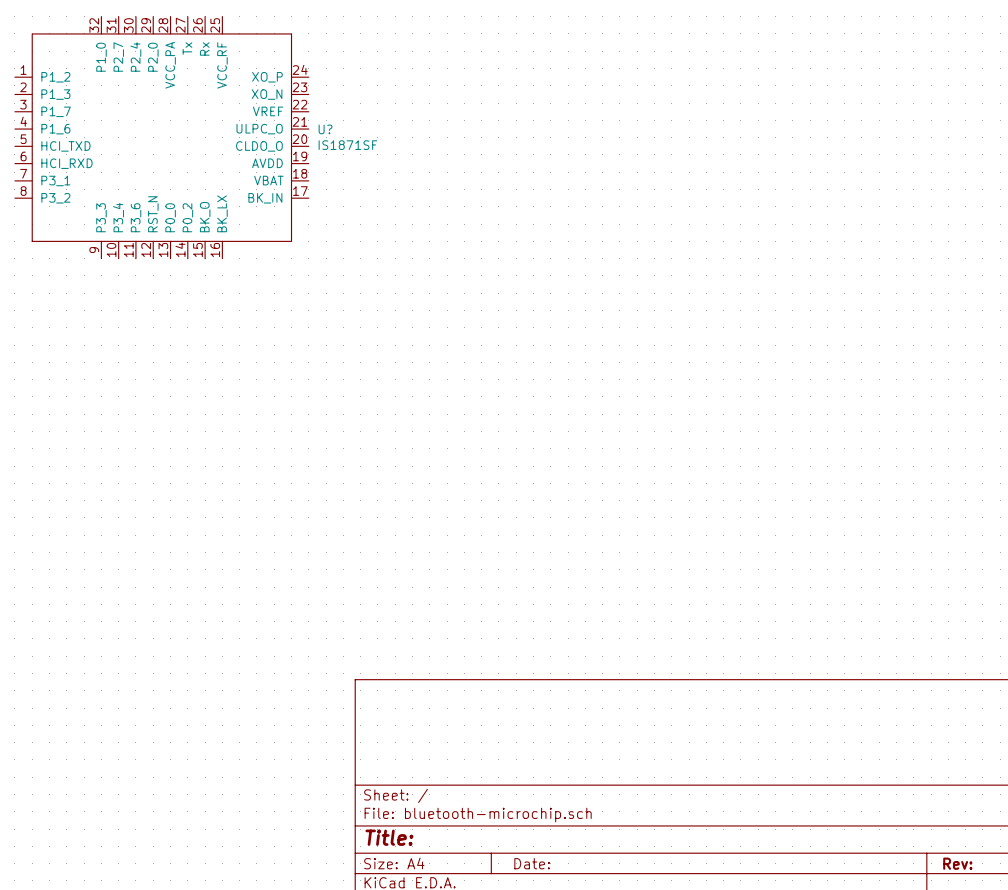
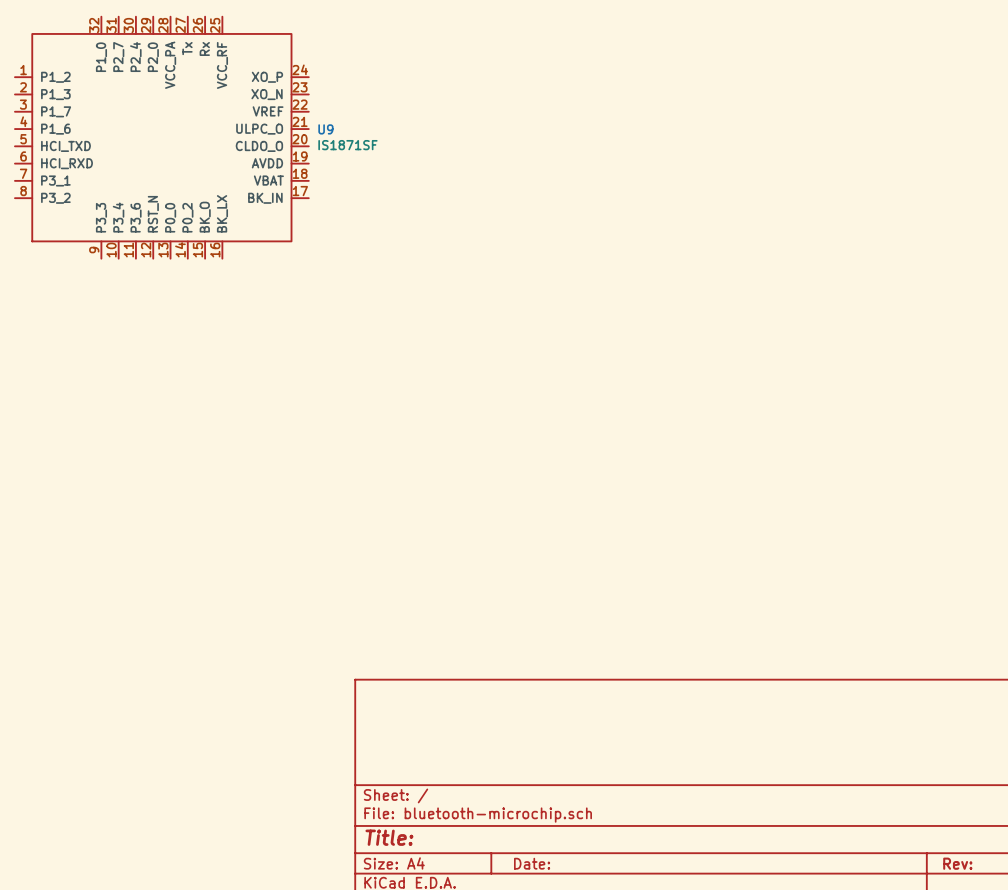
U? name: U? (325, 129) -> U9 (325, 129)

